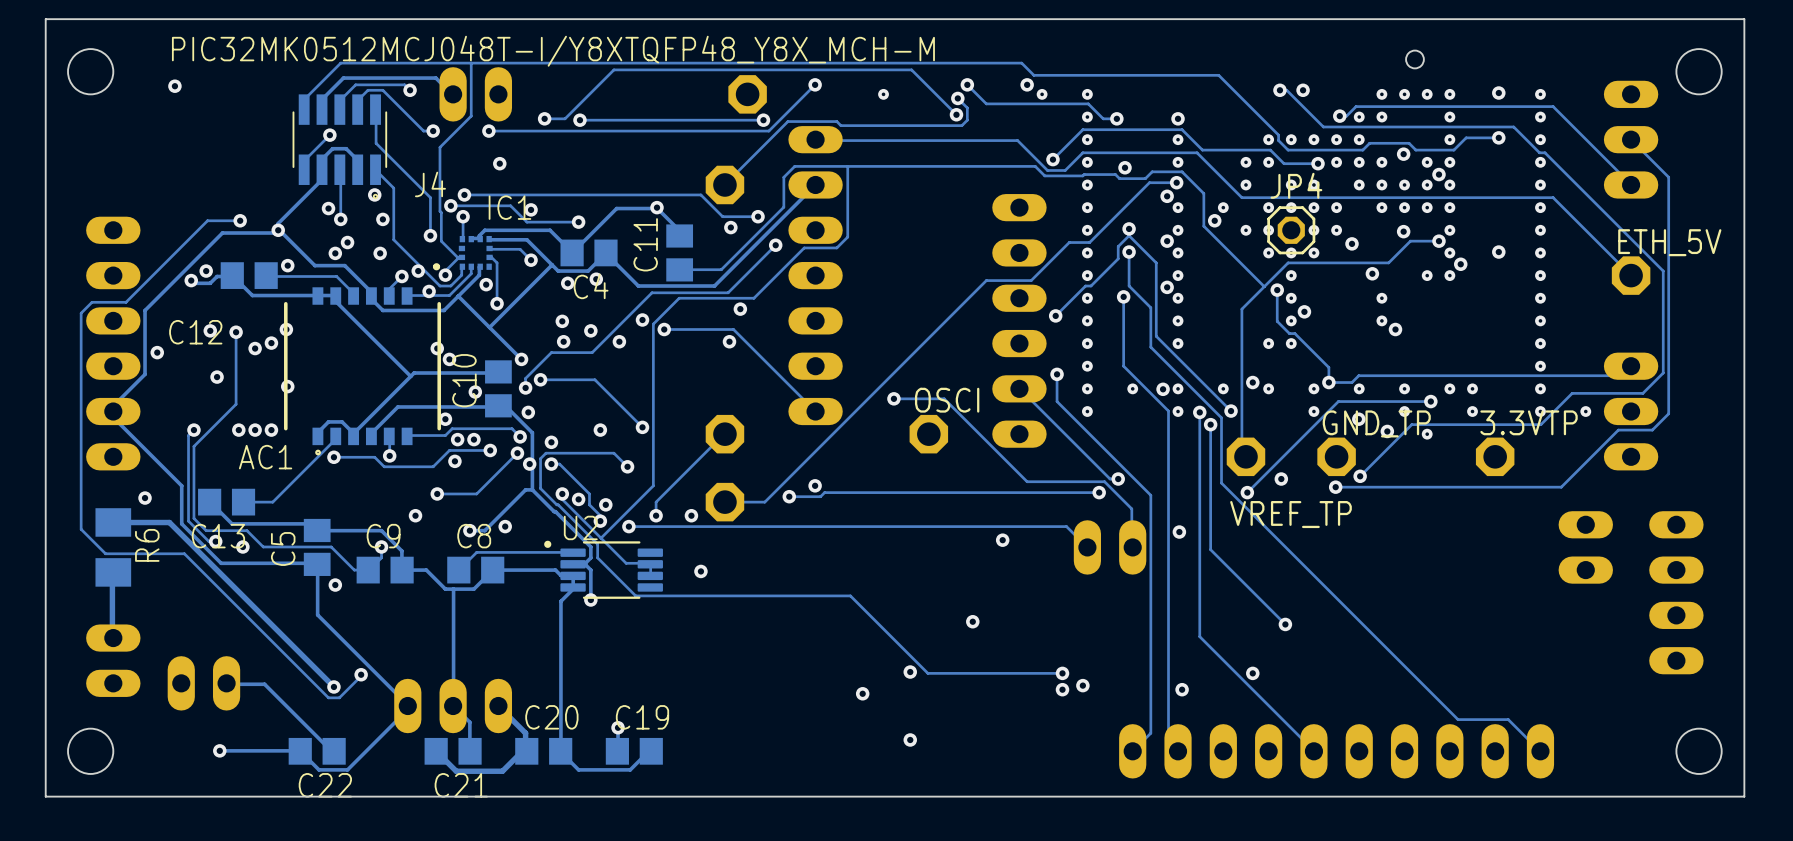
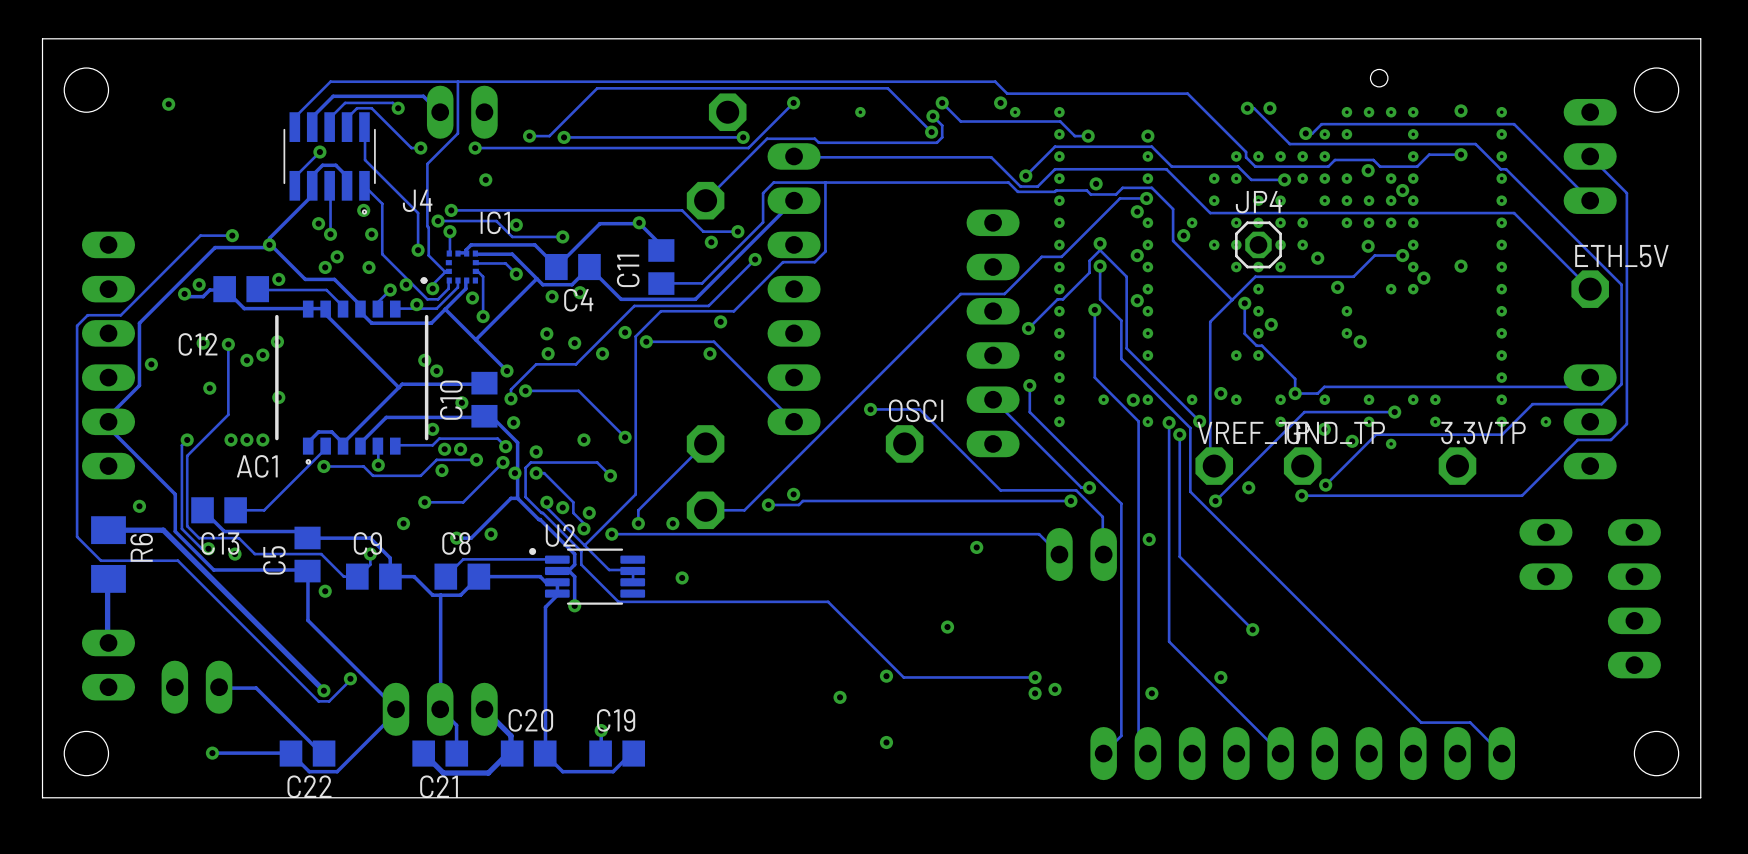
part: PIC32MK0512MCJ048T-I/Y8XTQFP48_Y8X_MCH-M (553, 51) -> none
VREF_TP name position: VREF_TP (1291, 514) -> VREF_TP (1253, 432)

